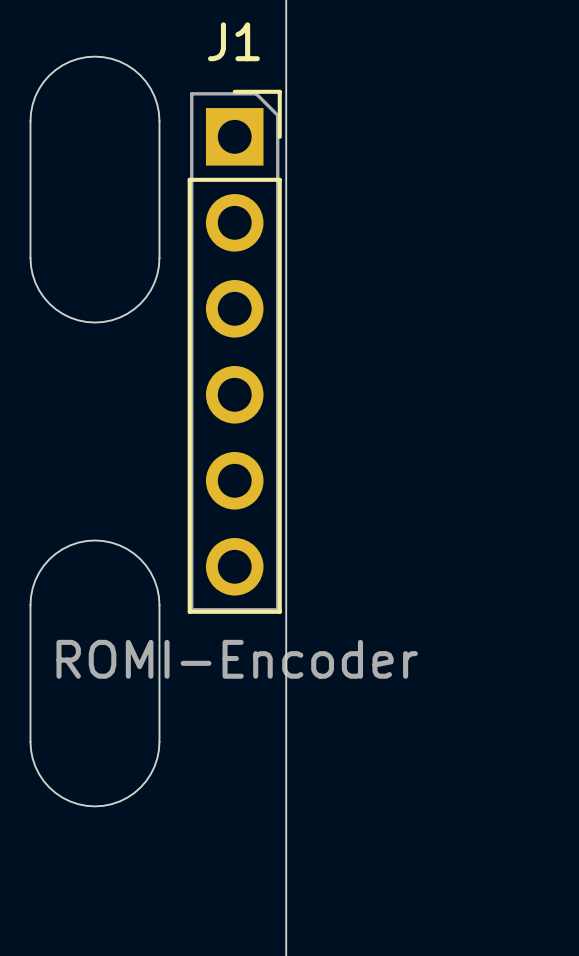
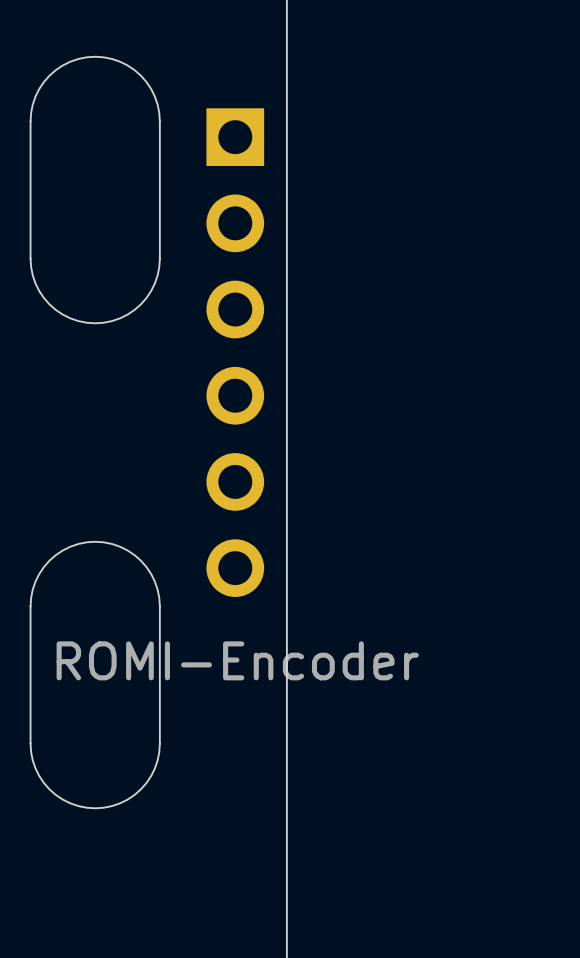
J1: ROMI-Encoder (234, 351) -> none

